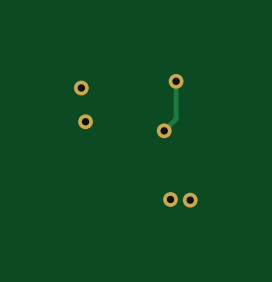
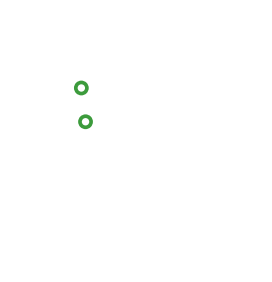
track: (176, 81) (176, 118) (164, 130) -> none
via: (176, 81) -> none
via: (164, 130) -> none
via: (170, 199) -> none
via: (190, 200) -> none

